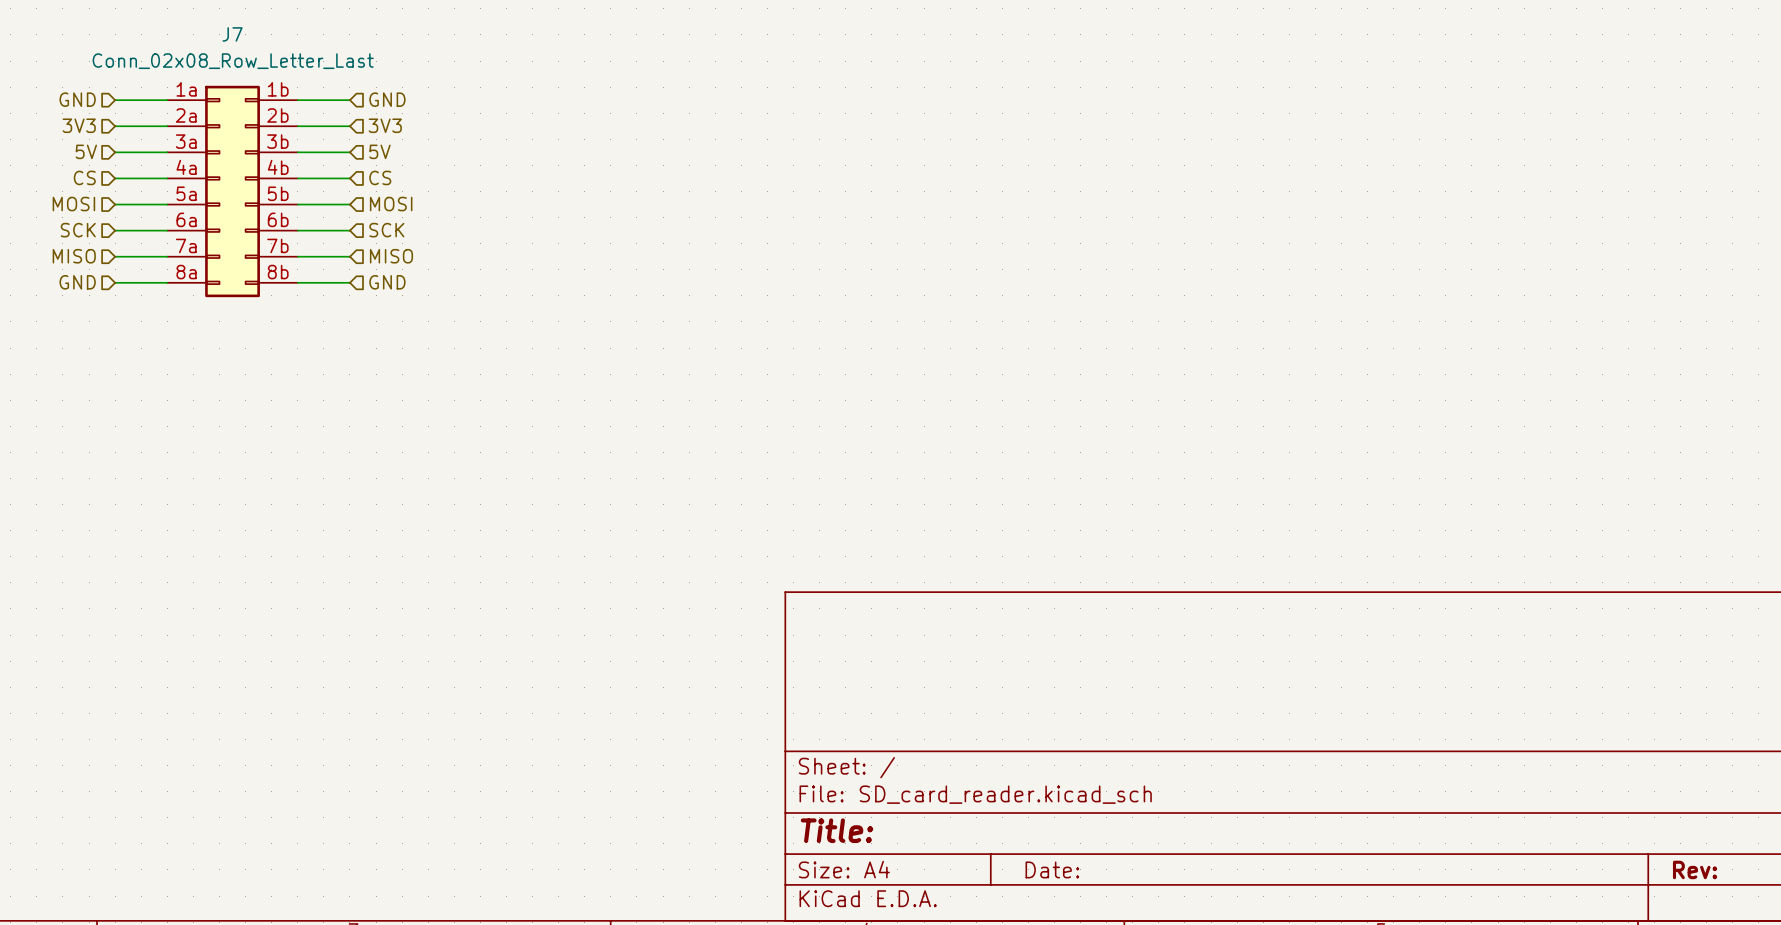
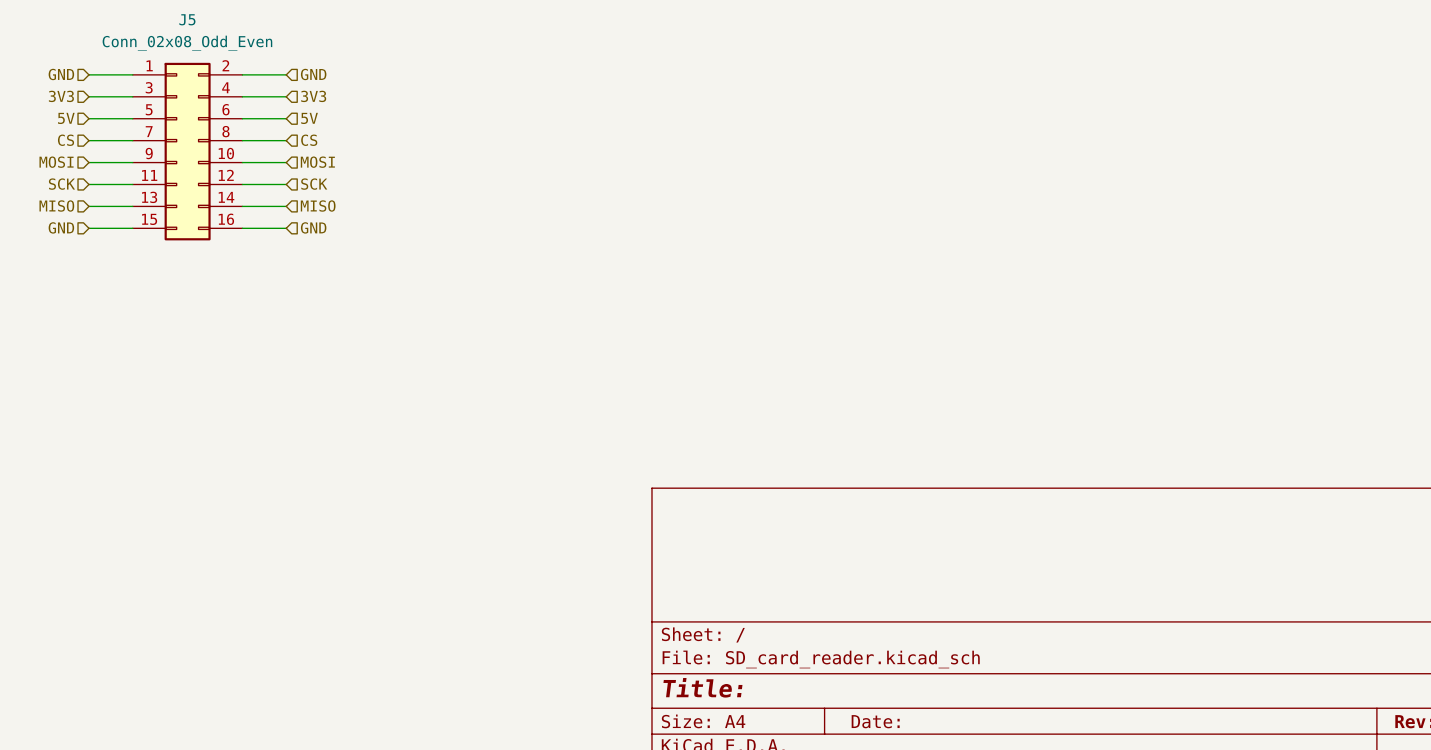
J7 name: J7 (232, 34) -> J5 (187, 19)
J7 value: Conn_02x08_Row_Letter_Last (233, 61) -> Conn_02x08_Odd_Even (187, 43)
J7 symbol: [167, 85, 298, 298] -> [132, 62, 243, 241]

